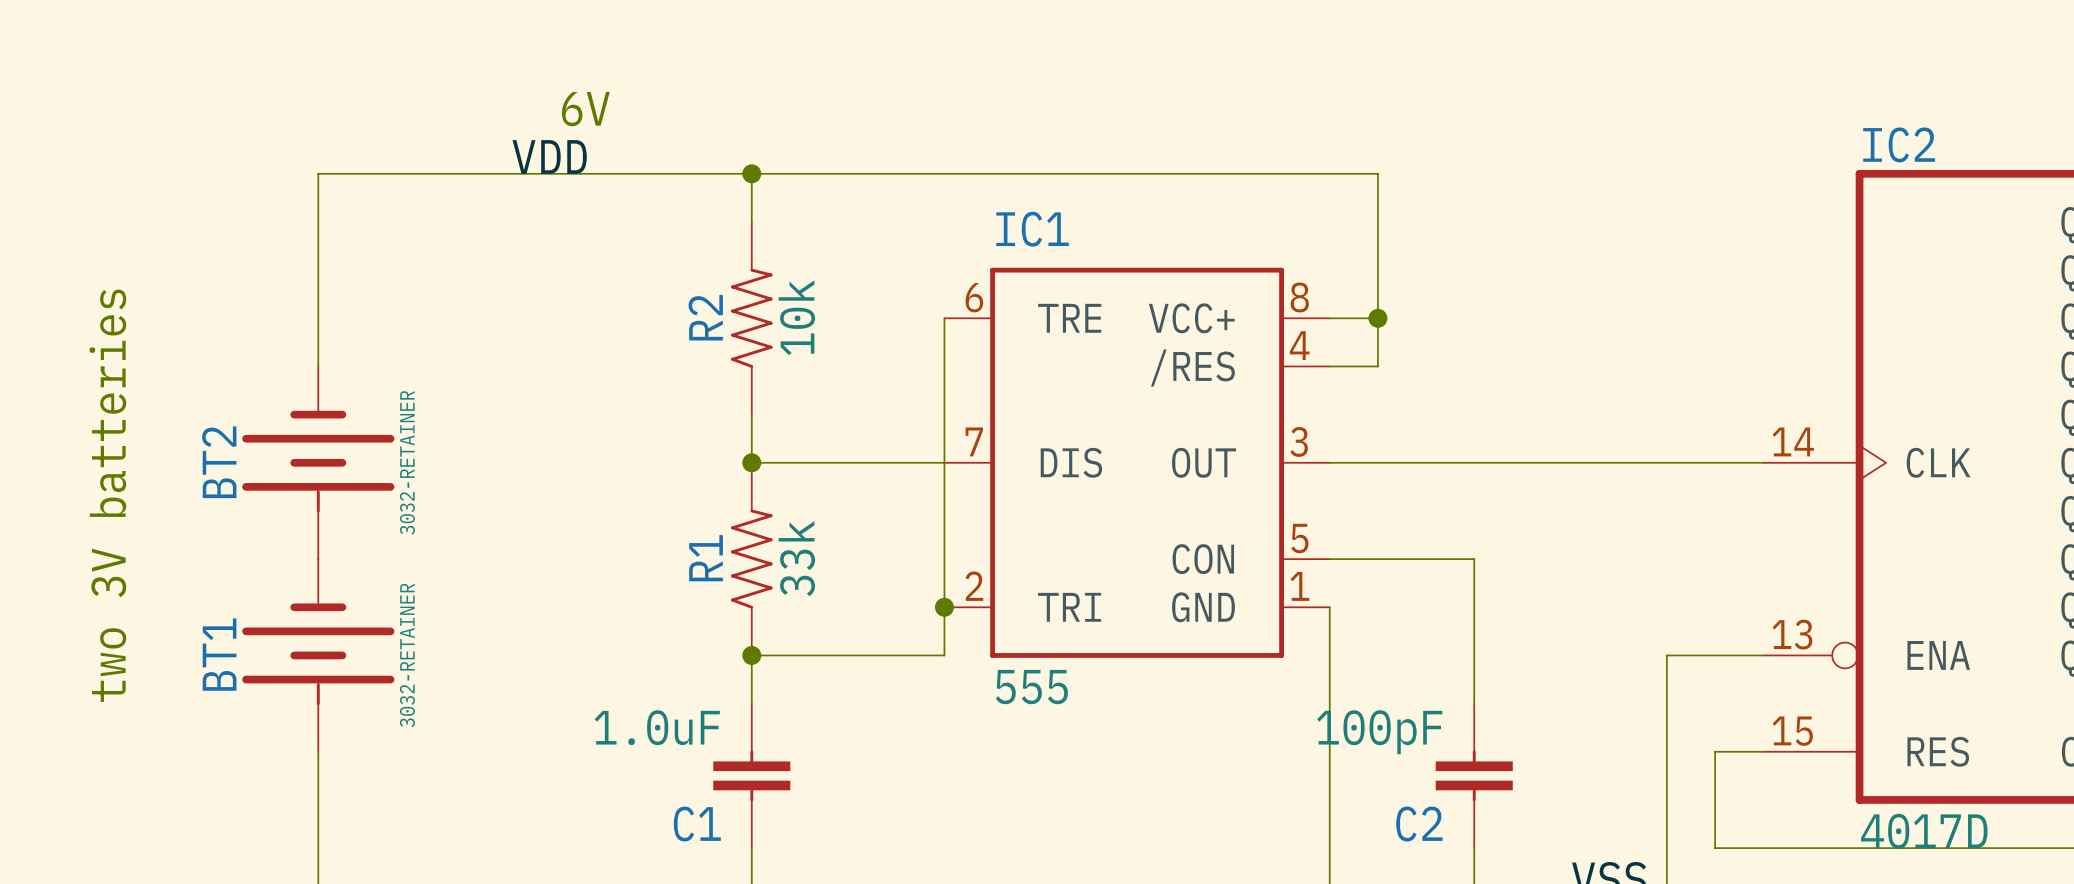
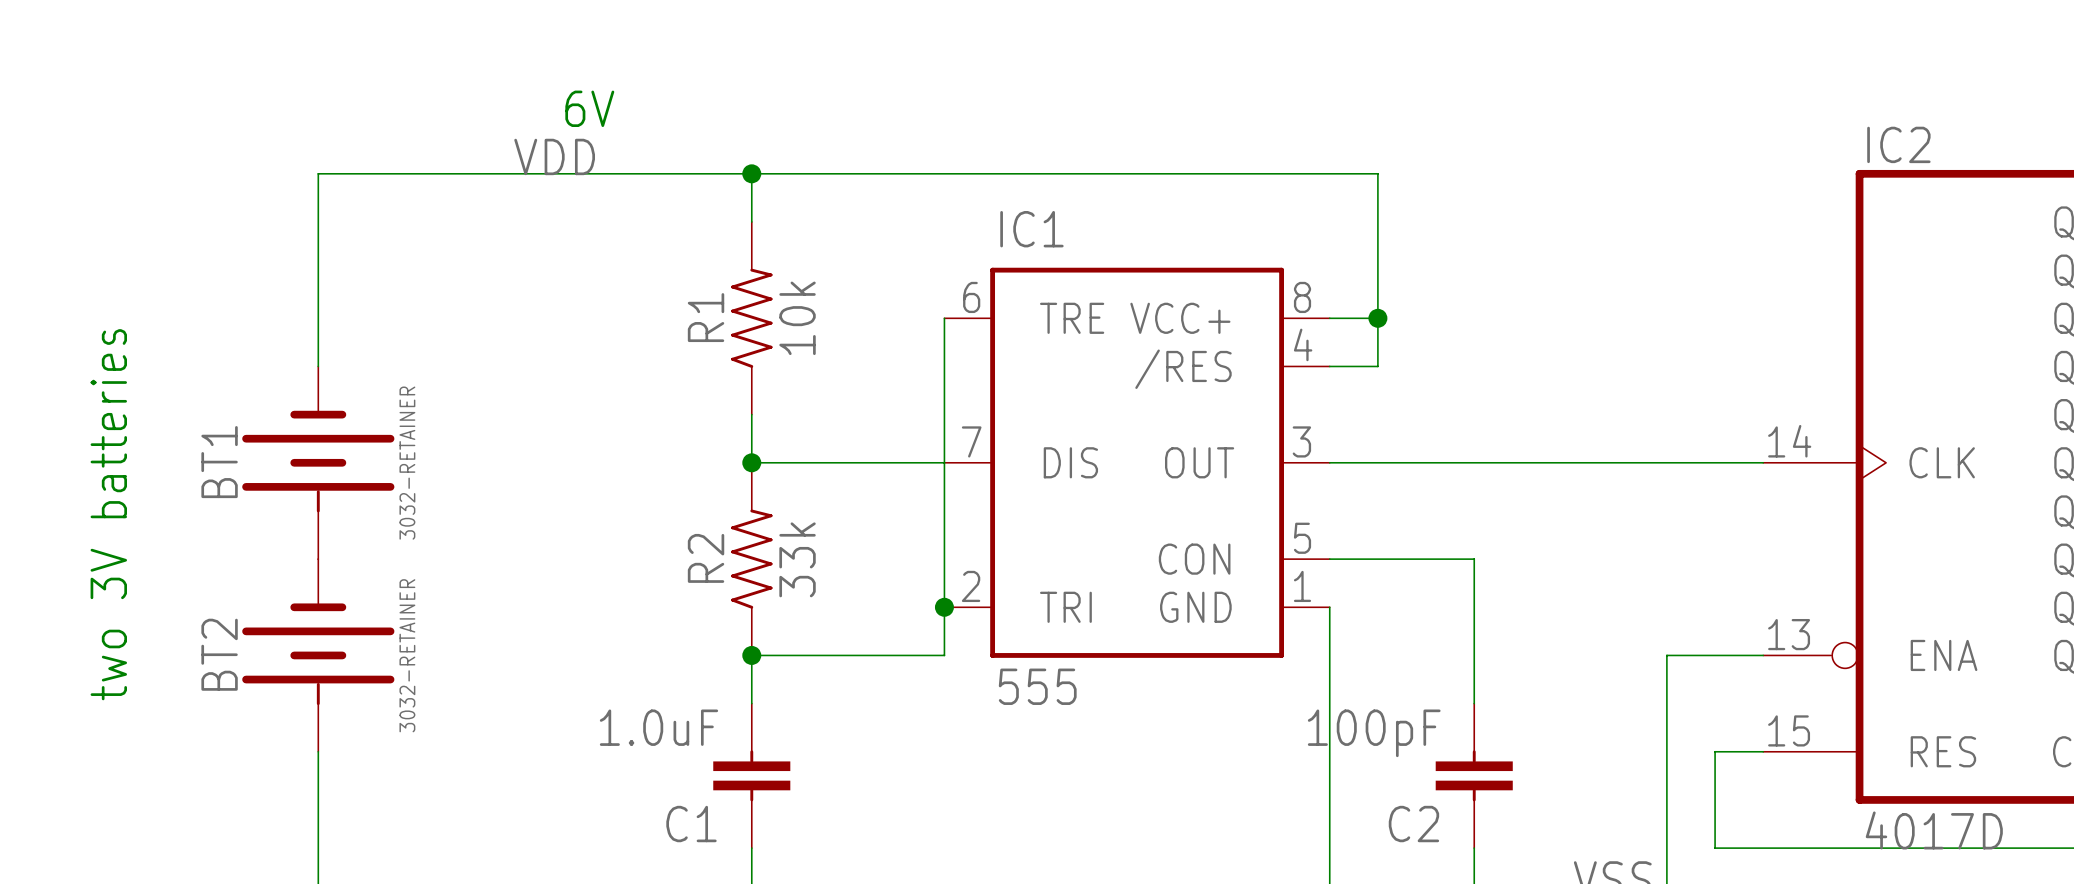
R2 name: R2 (705, 317) -> R1 (706, 317)
BT2 name: BT2 (219, 462) -> BT1 (219, 462)
R1 name: R1 (706, 558) -> R2 (706, 558)
BT1 name: BT1 (219, 654) -> BT2 (219, 654)

